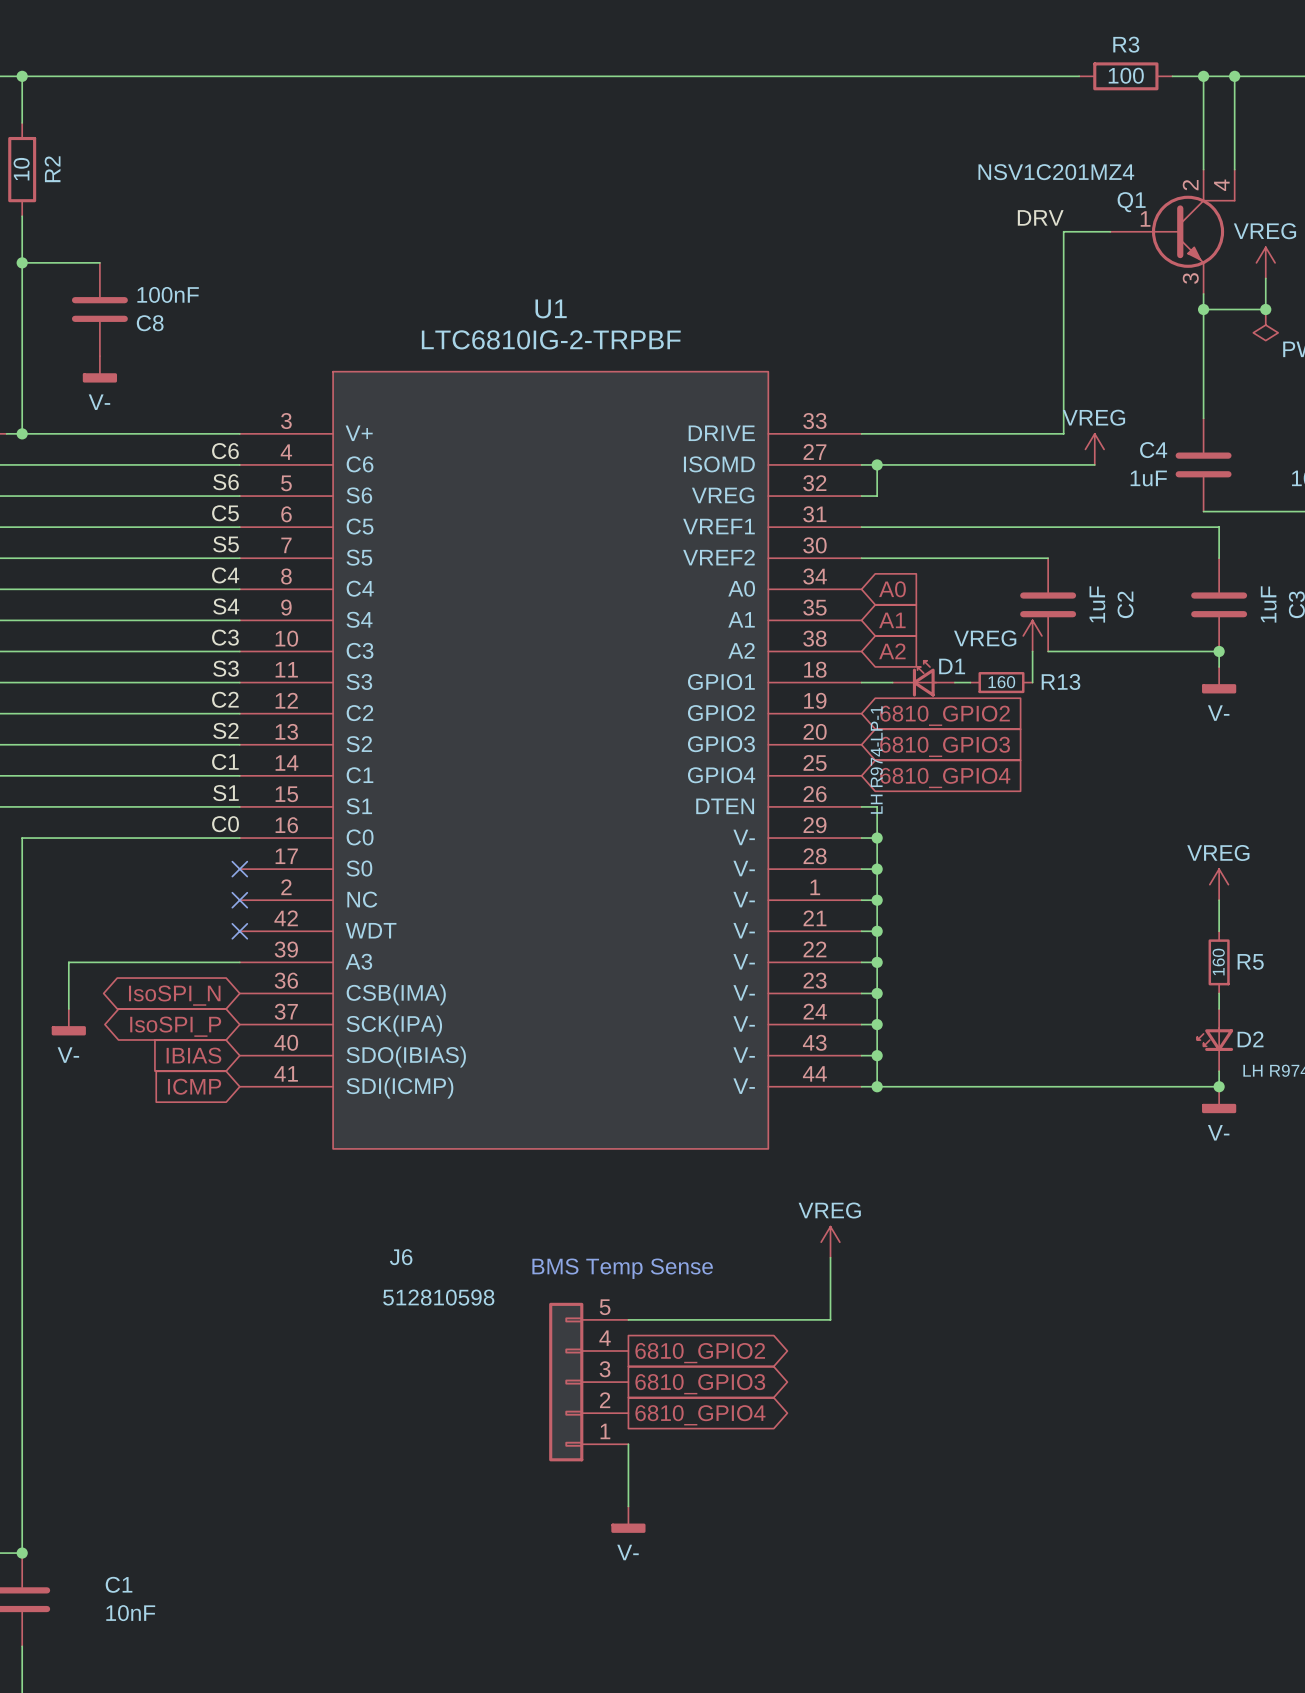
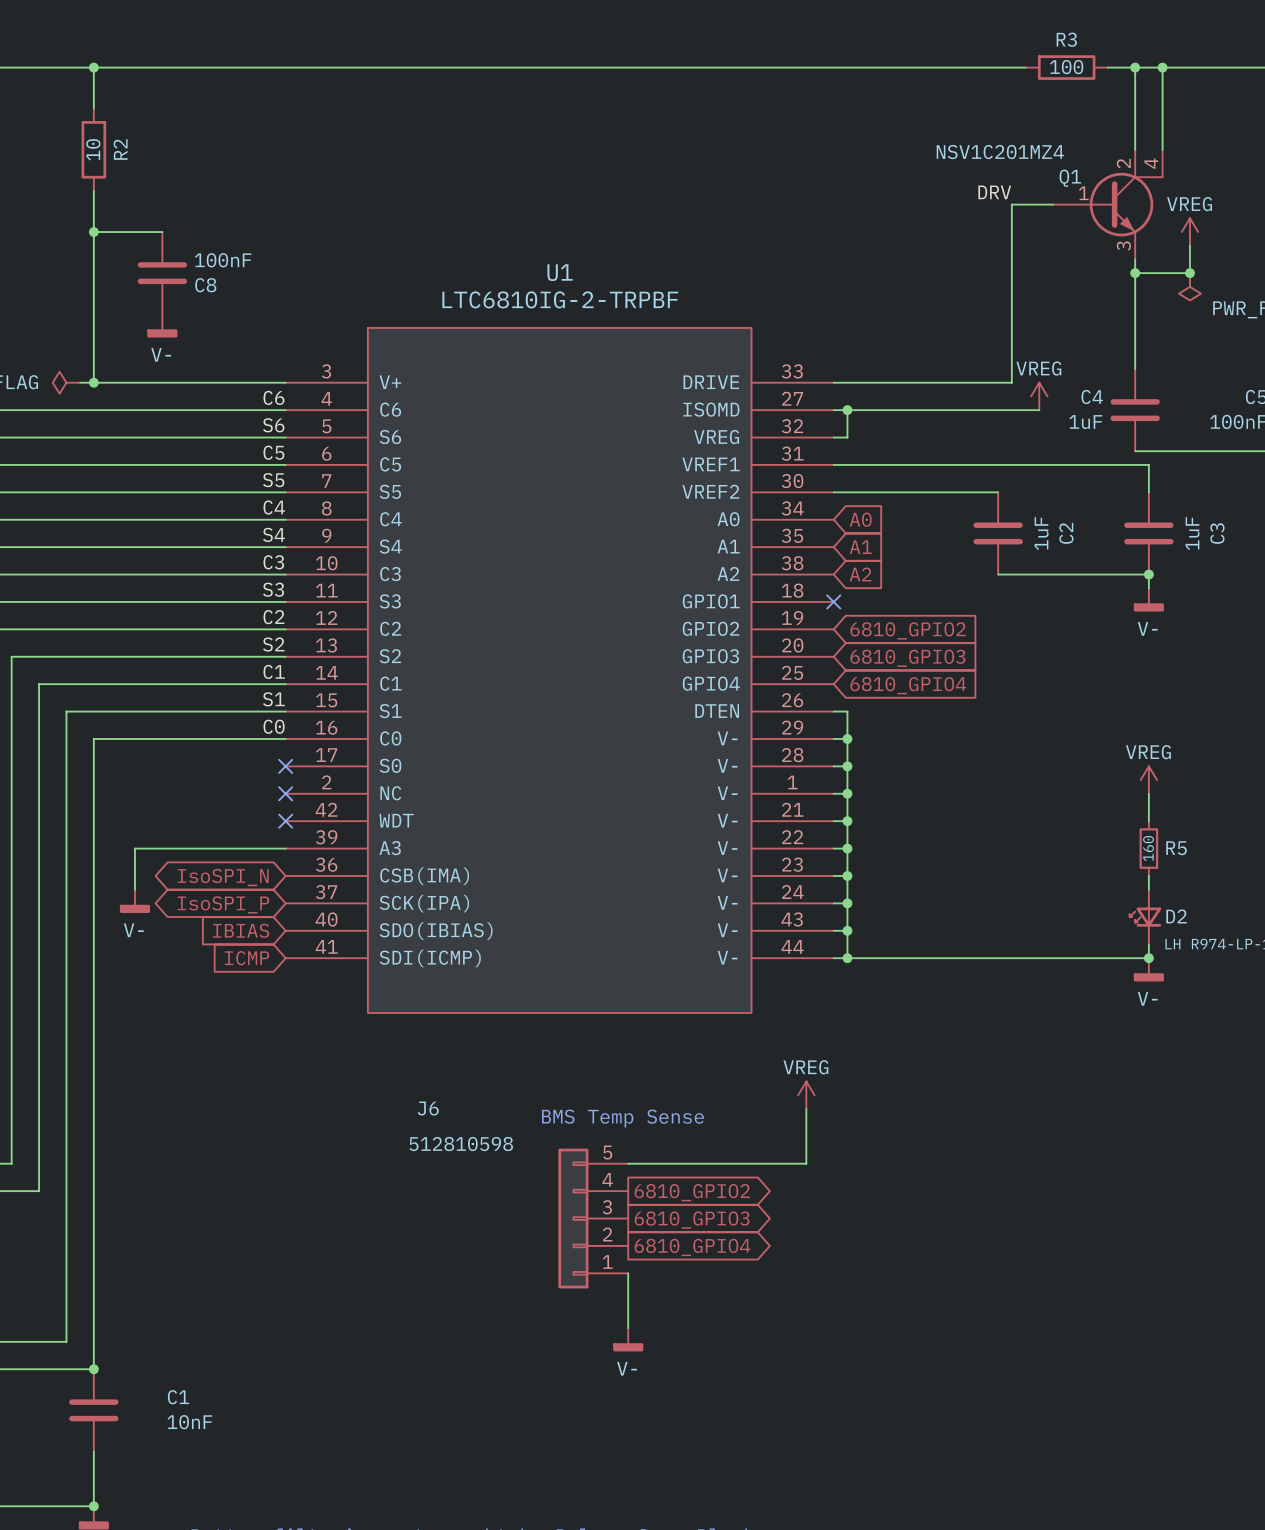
power symbol: VREG (1032, 635) -> none
wire: (1032, 651) (1032, 682) -> none
D1: LH R974-LP-1 (923, 678) -> none
wire: (861, 682) (892, 682) -> none
no-connect mark: none -> (833, 601)
wire: (954, 682) (970, 682) -> none
R13: 160 (1001, 682) -> none

